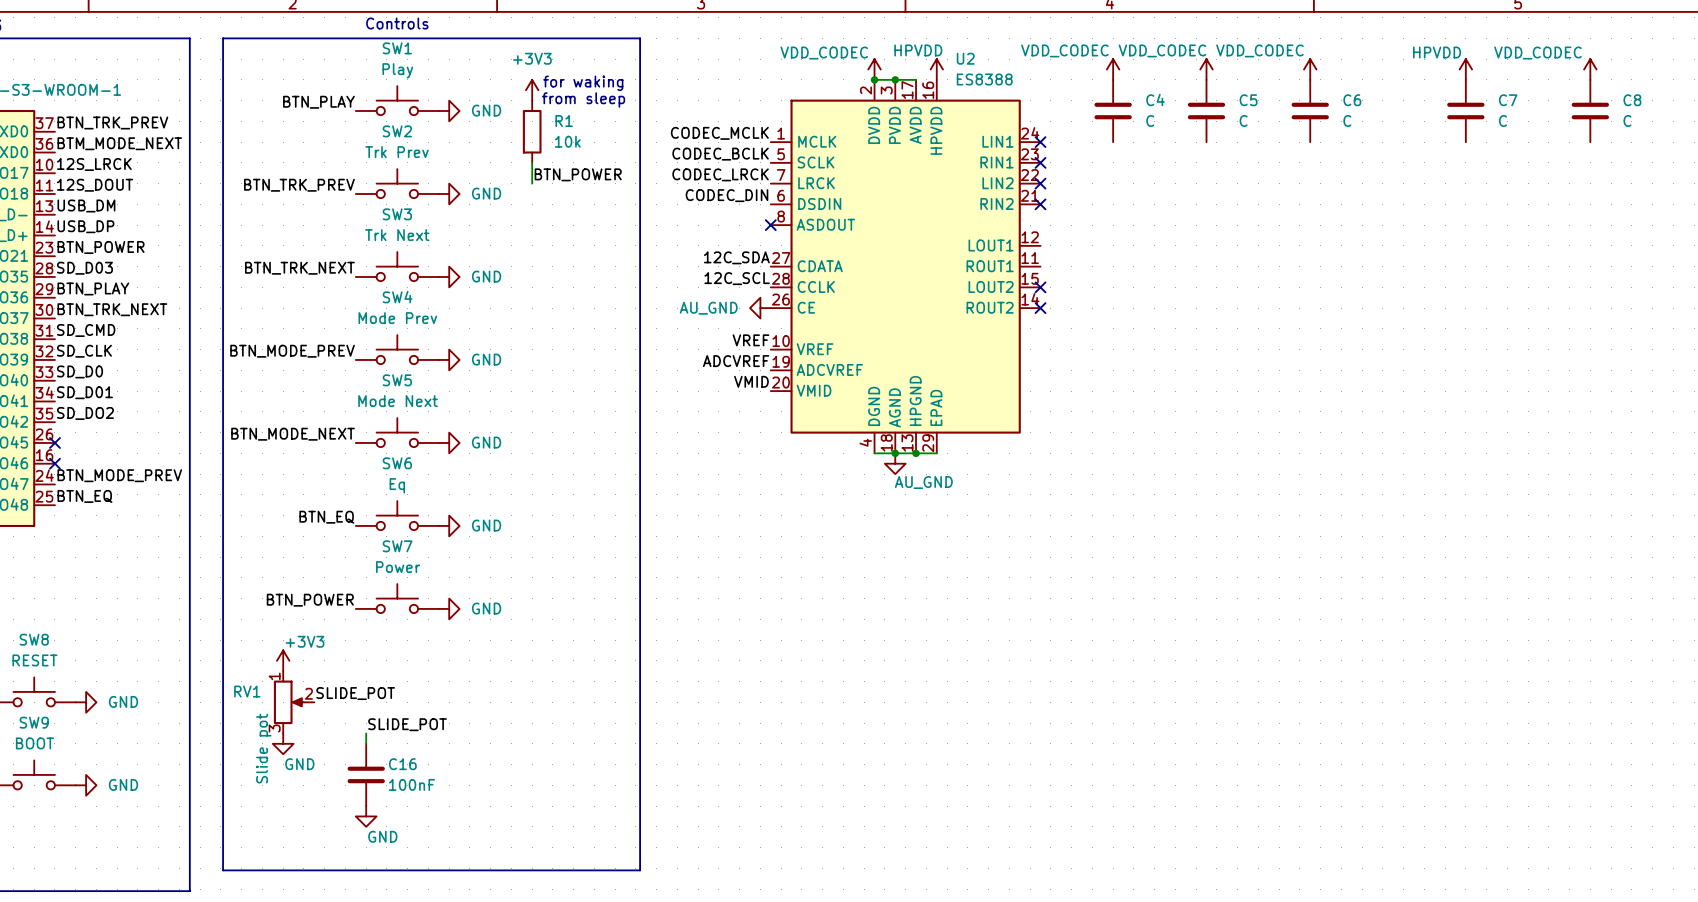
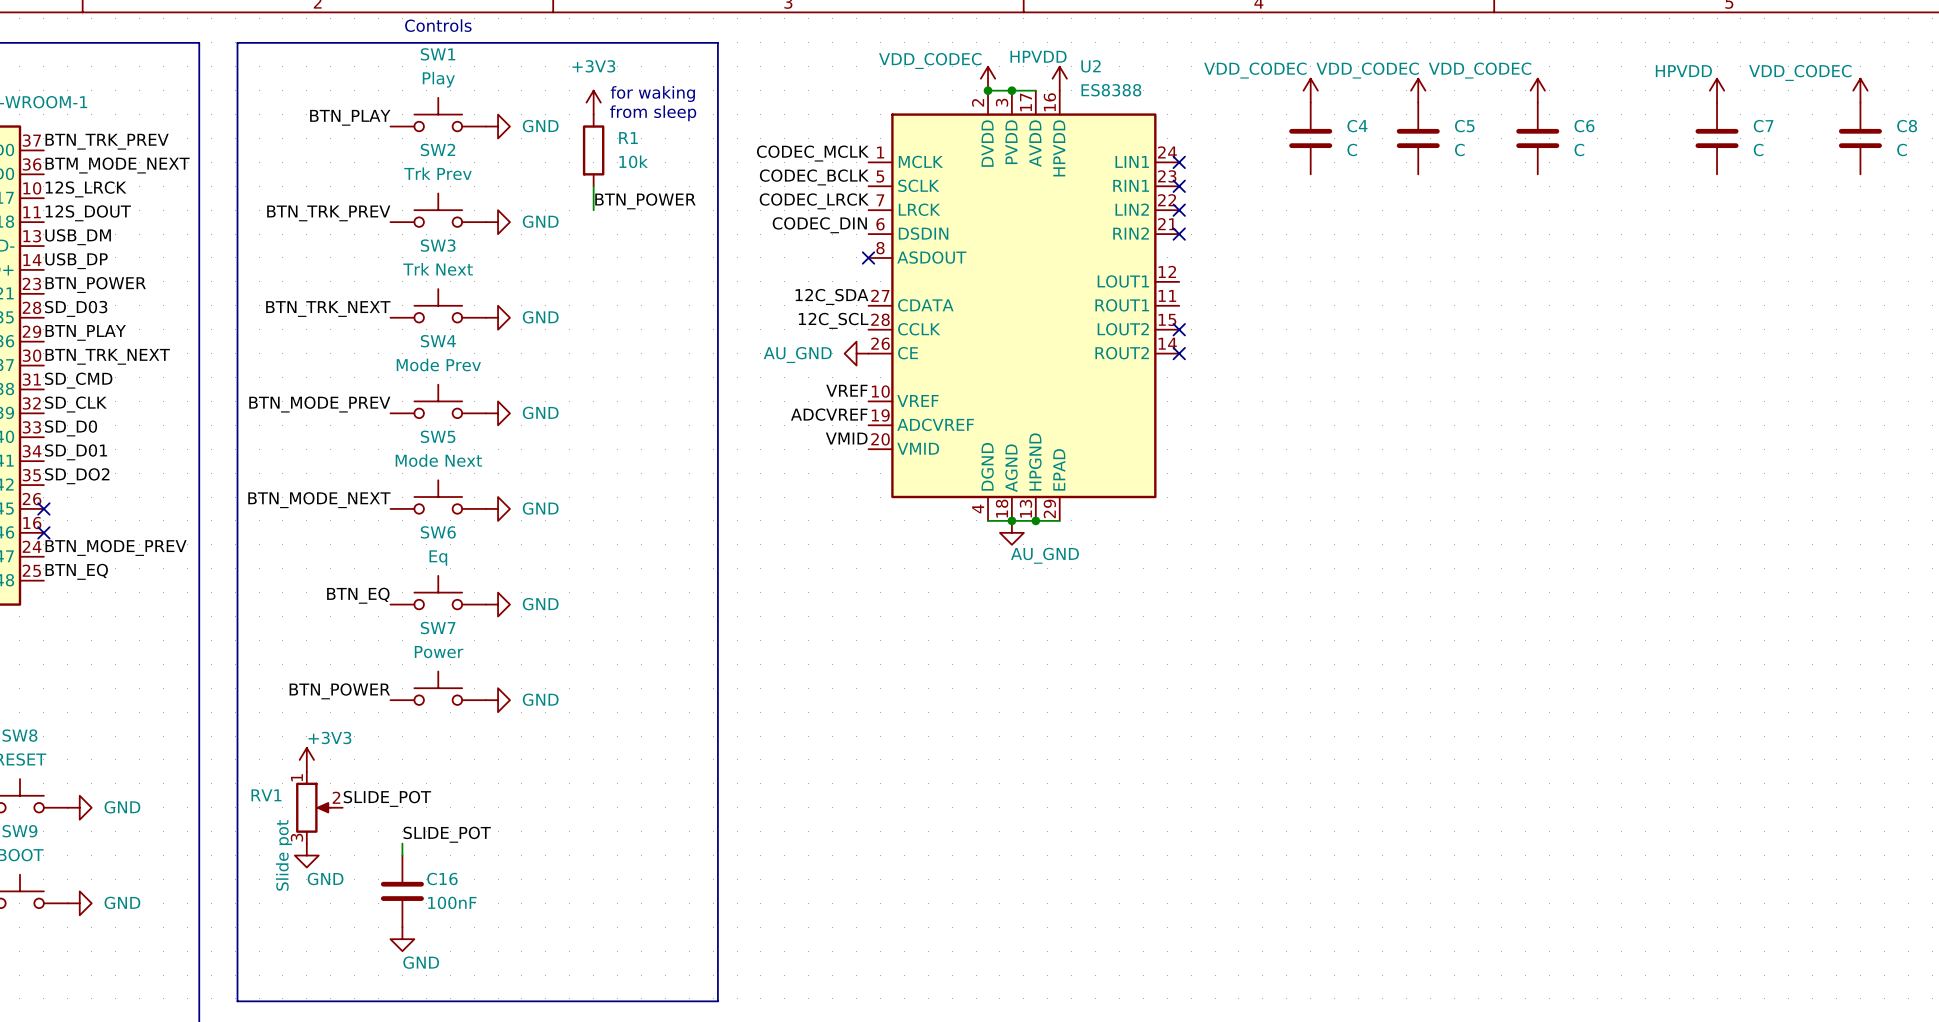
power symbol: VDD_CODEC (1113, 69) -> none
power symbol: VDD_CODEC (1206, 69) -> none
power symbol: VDD_CODEC (1310, 69) -> none
power symbol position: HPVDD (1465, 69) -> HPVDD (1717, 90)
power symbol position: VDD_CODEC (1590, 69) -> VDD_CODEC (1860, 90)
power symbol: none -> VDD_CODEC (1310, 90)
power symbol: none -> VDD_CODEC (1418, 90)
power symbol: none -> VDD_CODEC (1537, 90)
C4 position: (1113, 111) -> (1310, 138)
C5 position: (1206, 111) -> (1418, 138)
C6 position: (1310, 111) -> (1537, 138)
C7 position: (1465, 111) -> (1717, 138)
C8 position: (1590, 111) -> (1860, 138)

